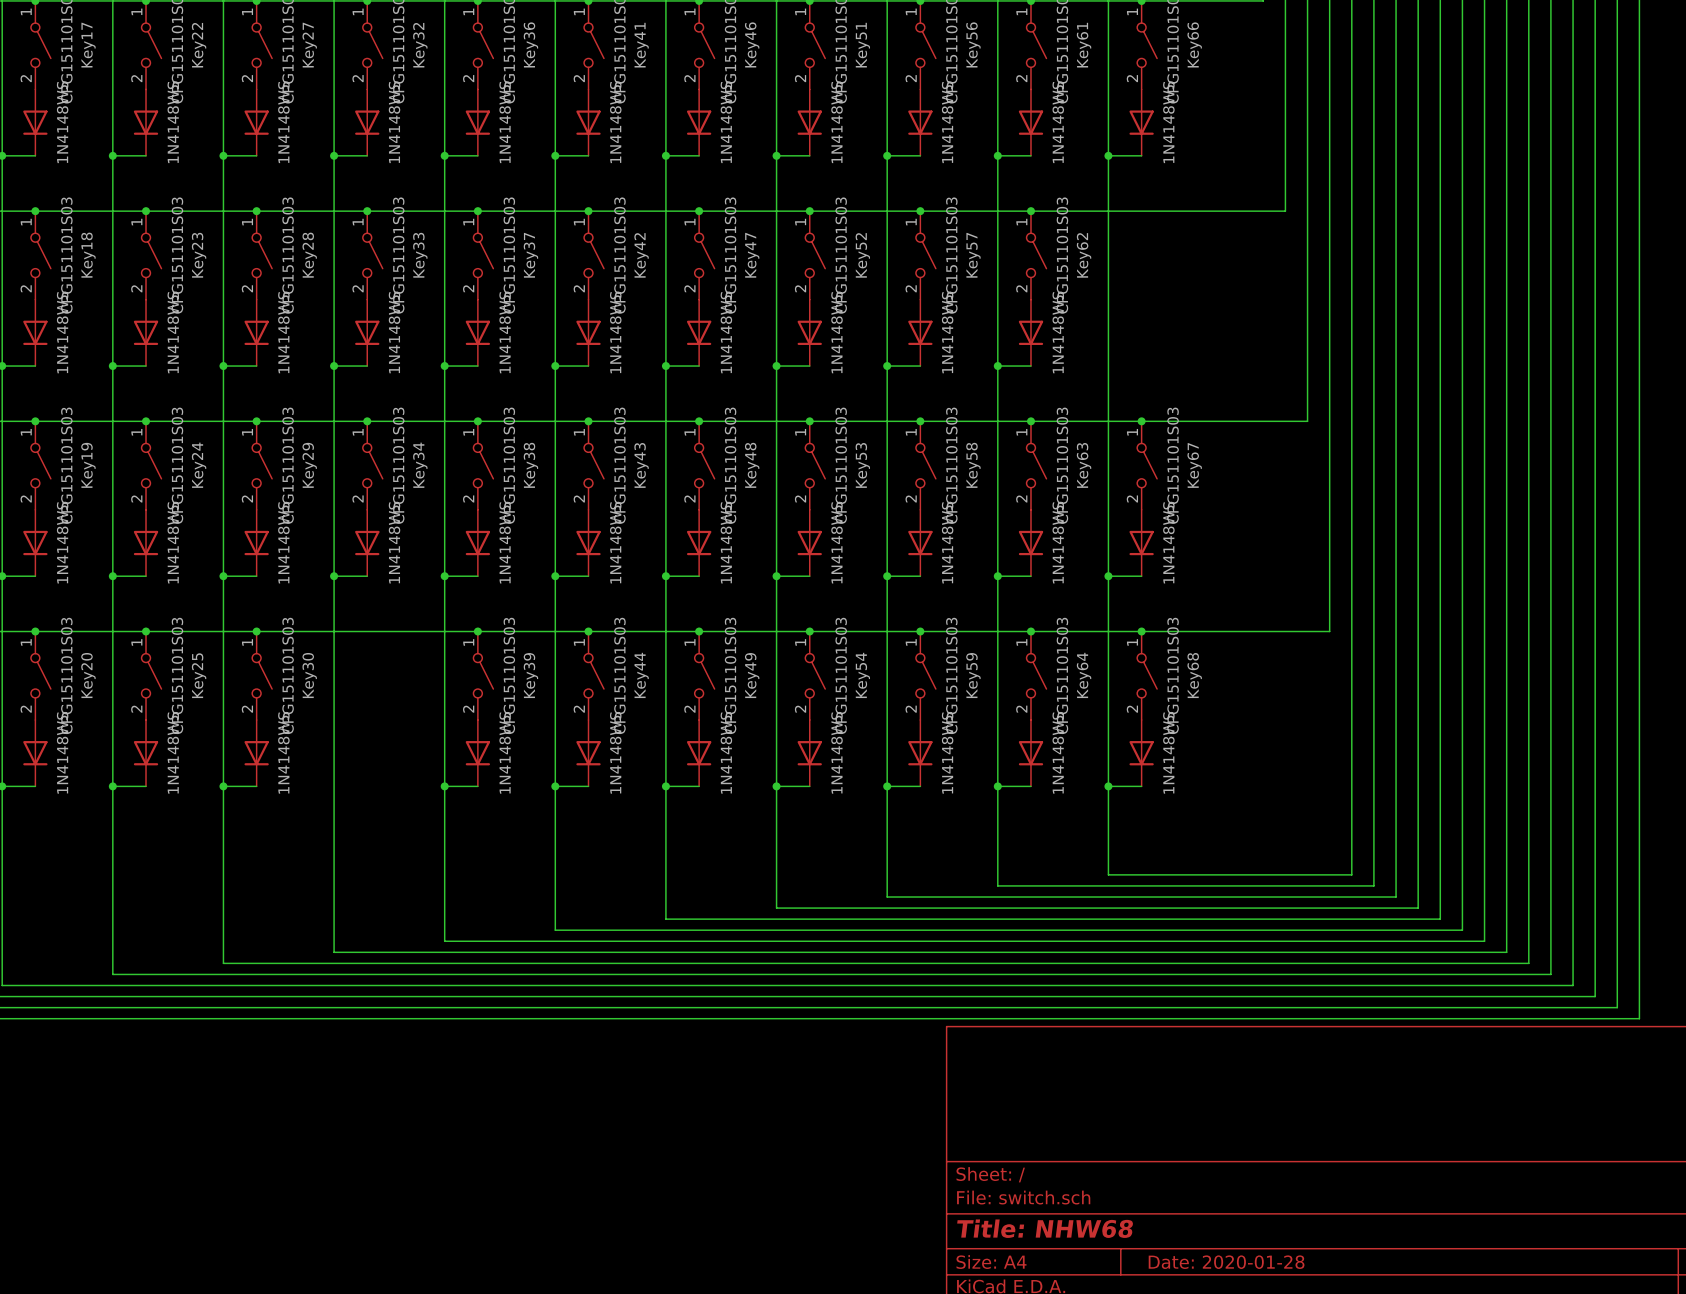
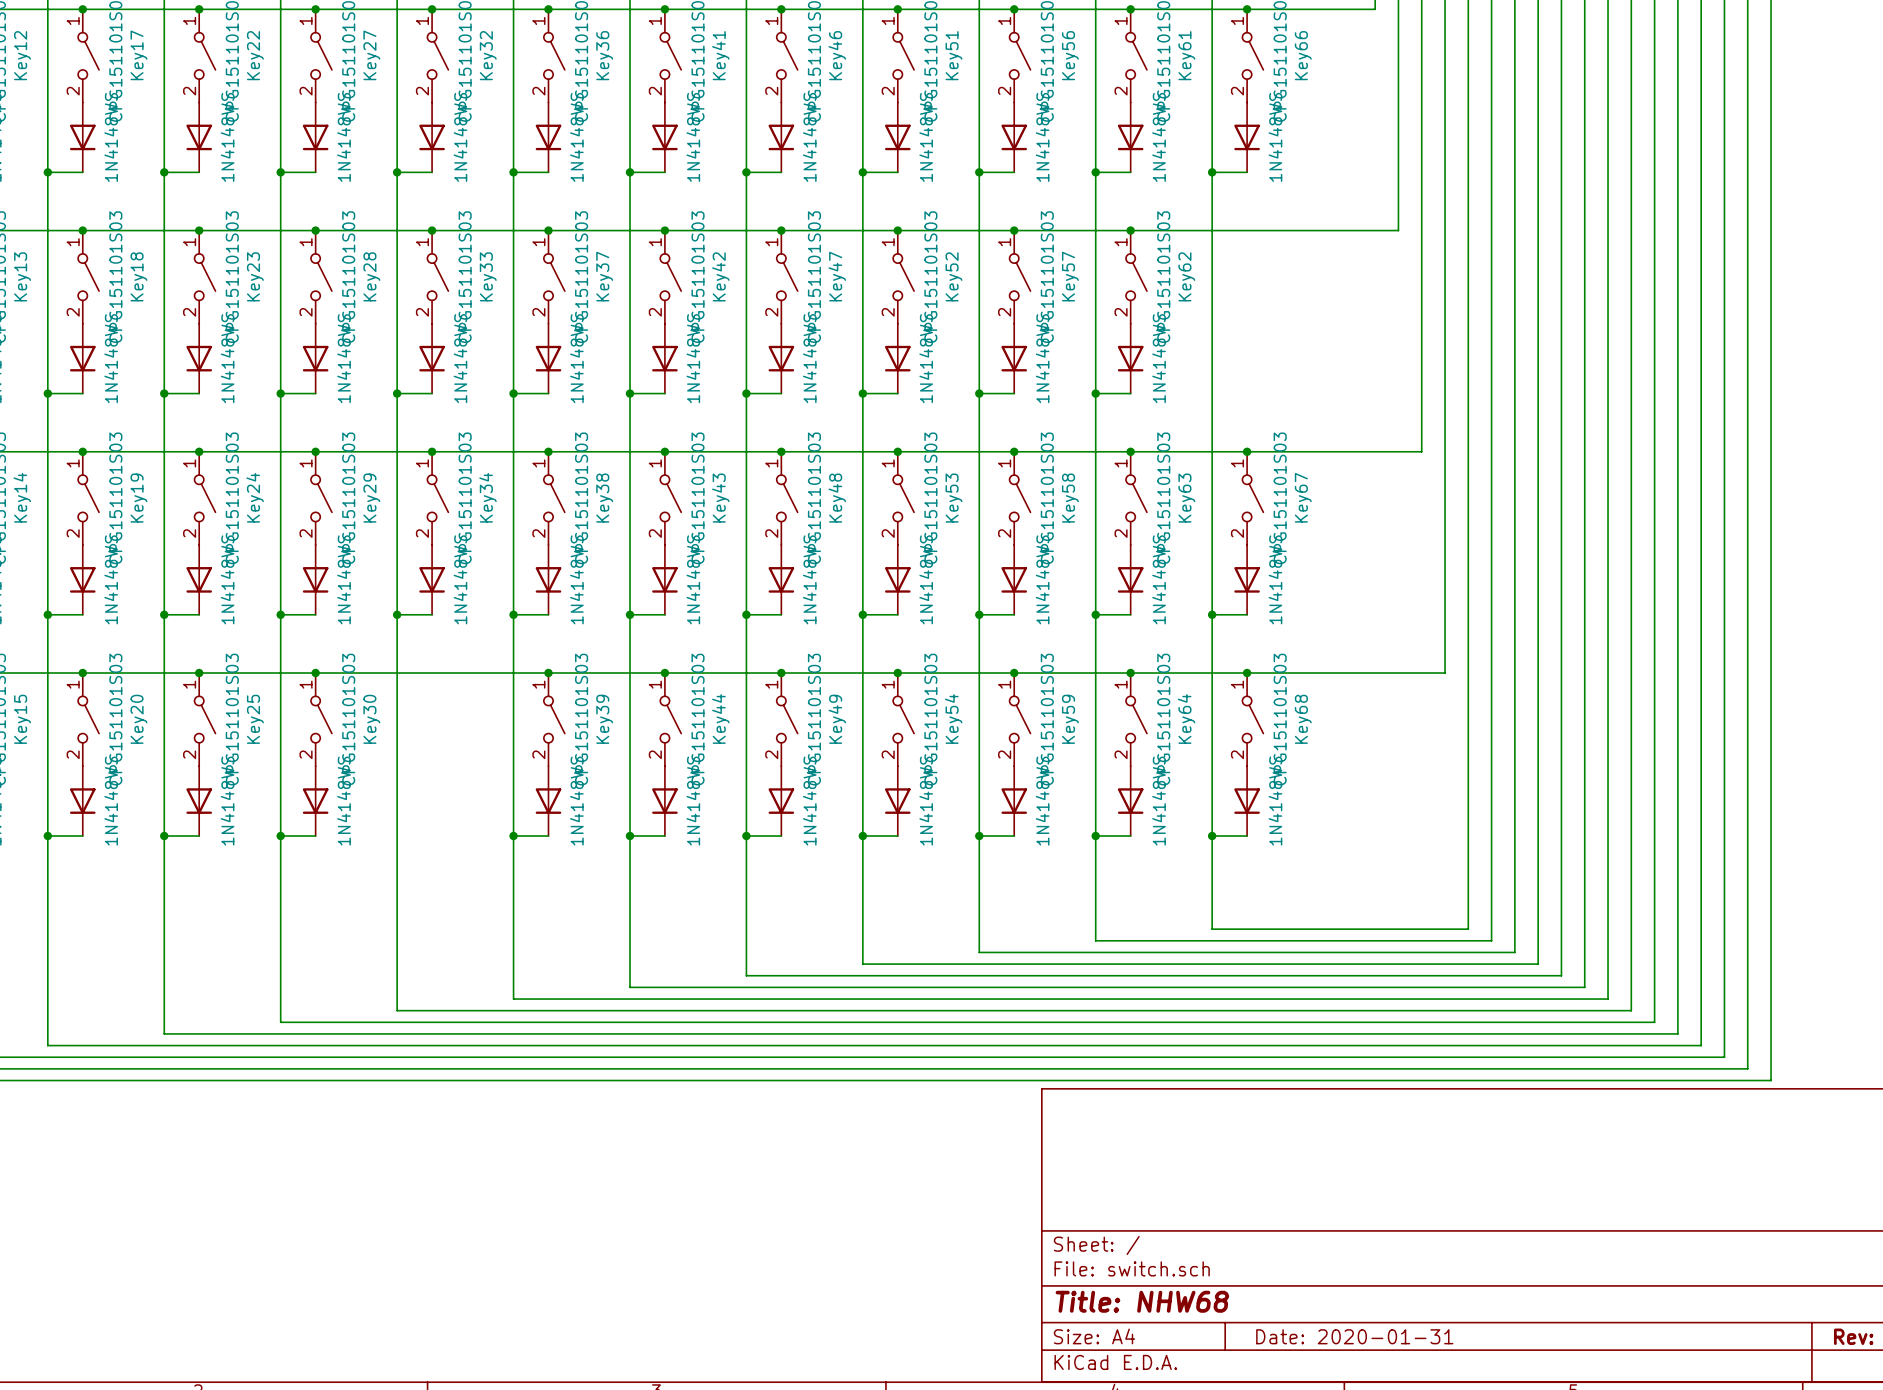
title block: Date: 2020-01-28 (1226, 1262) -> Date: 2020-01-31 (1354, 1336)

